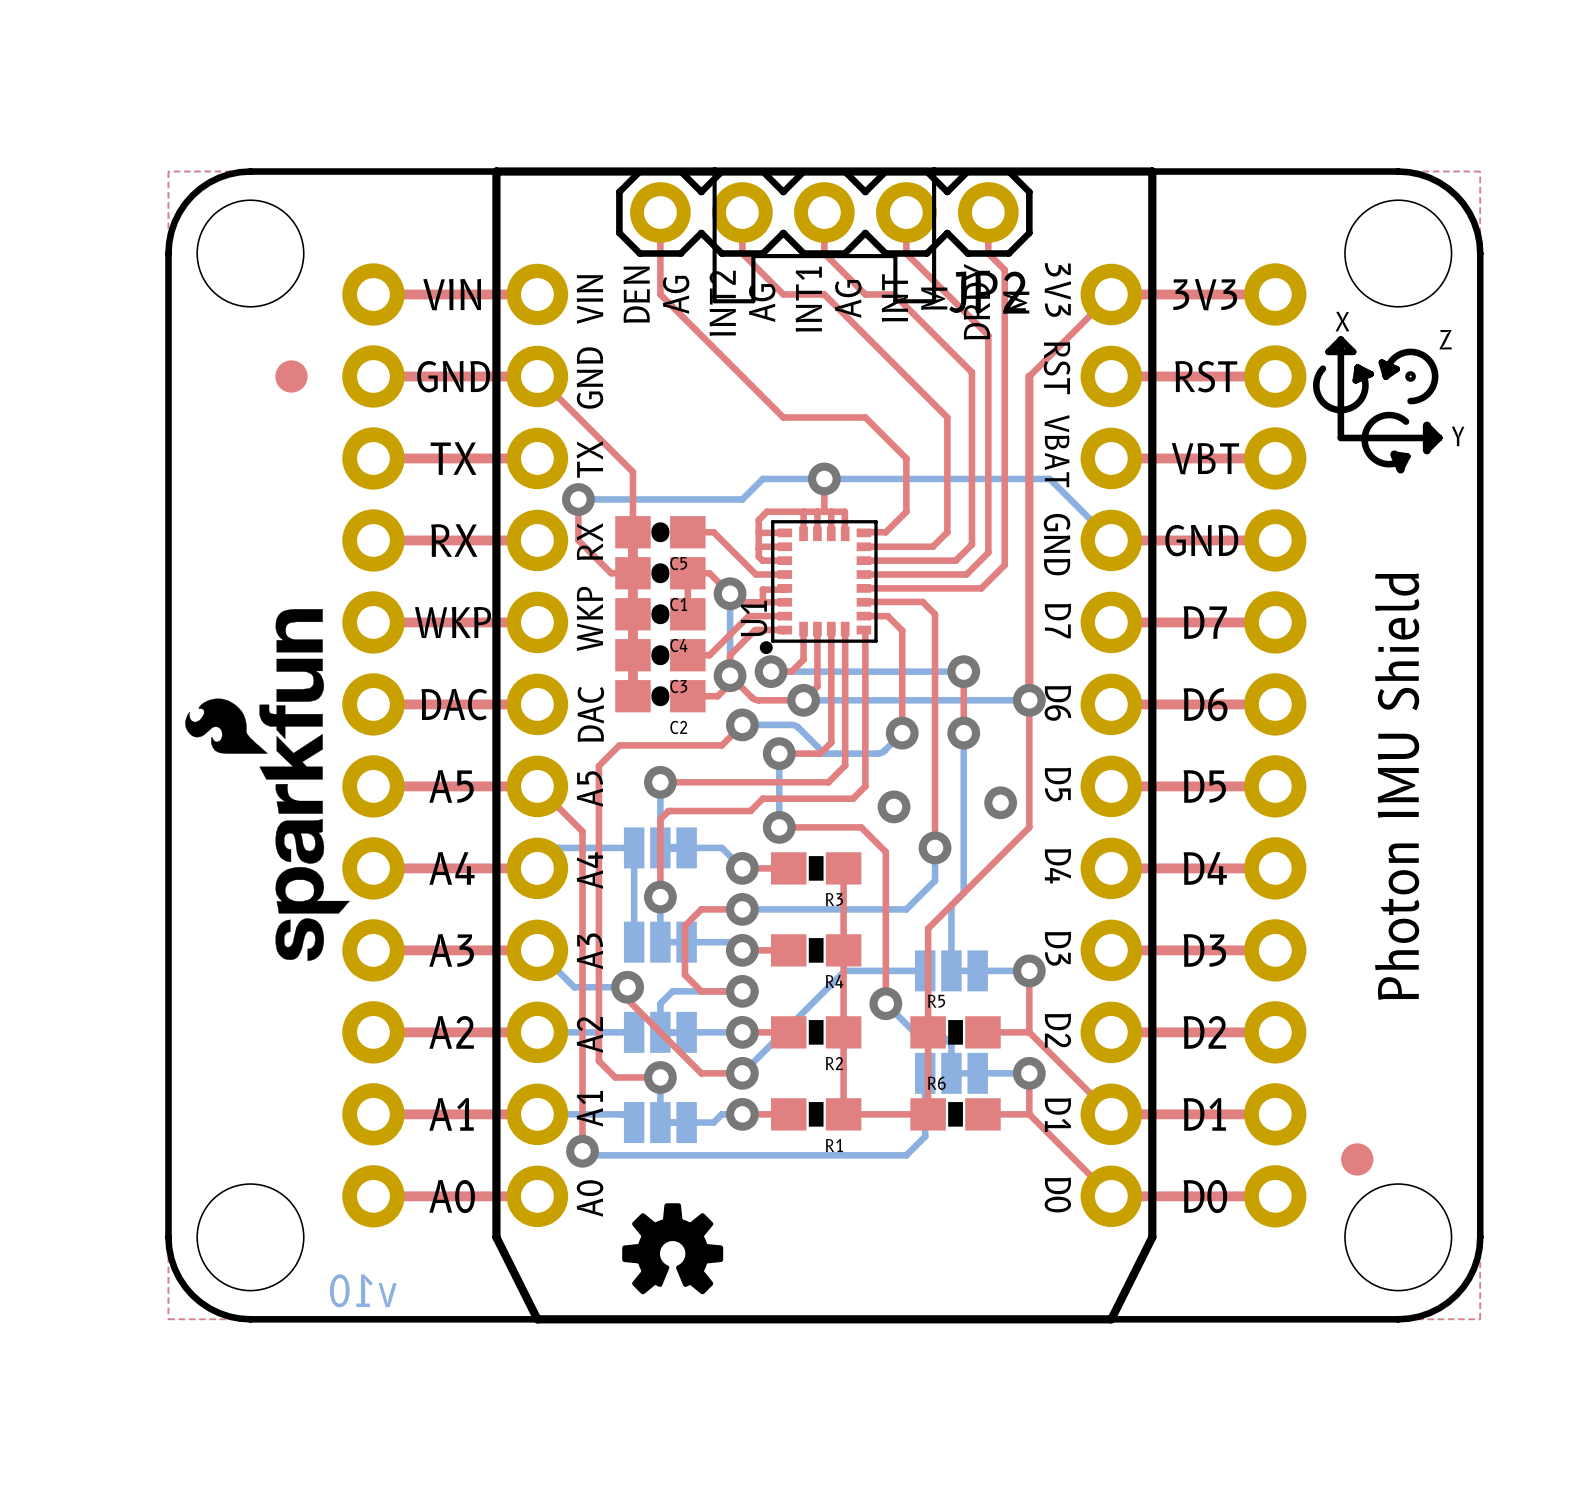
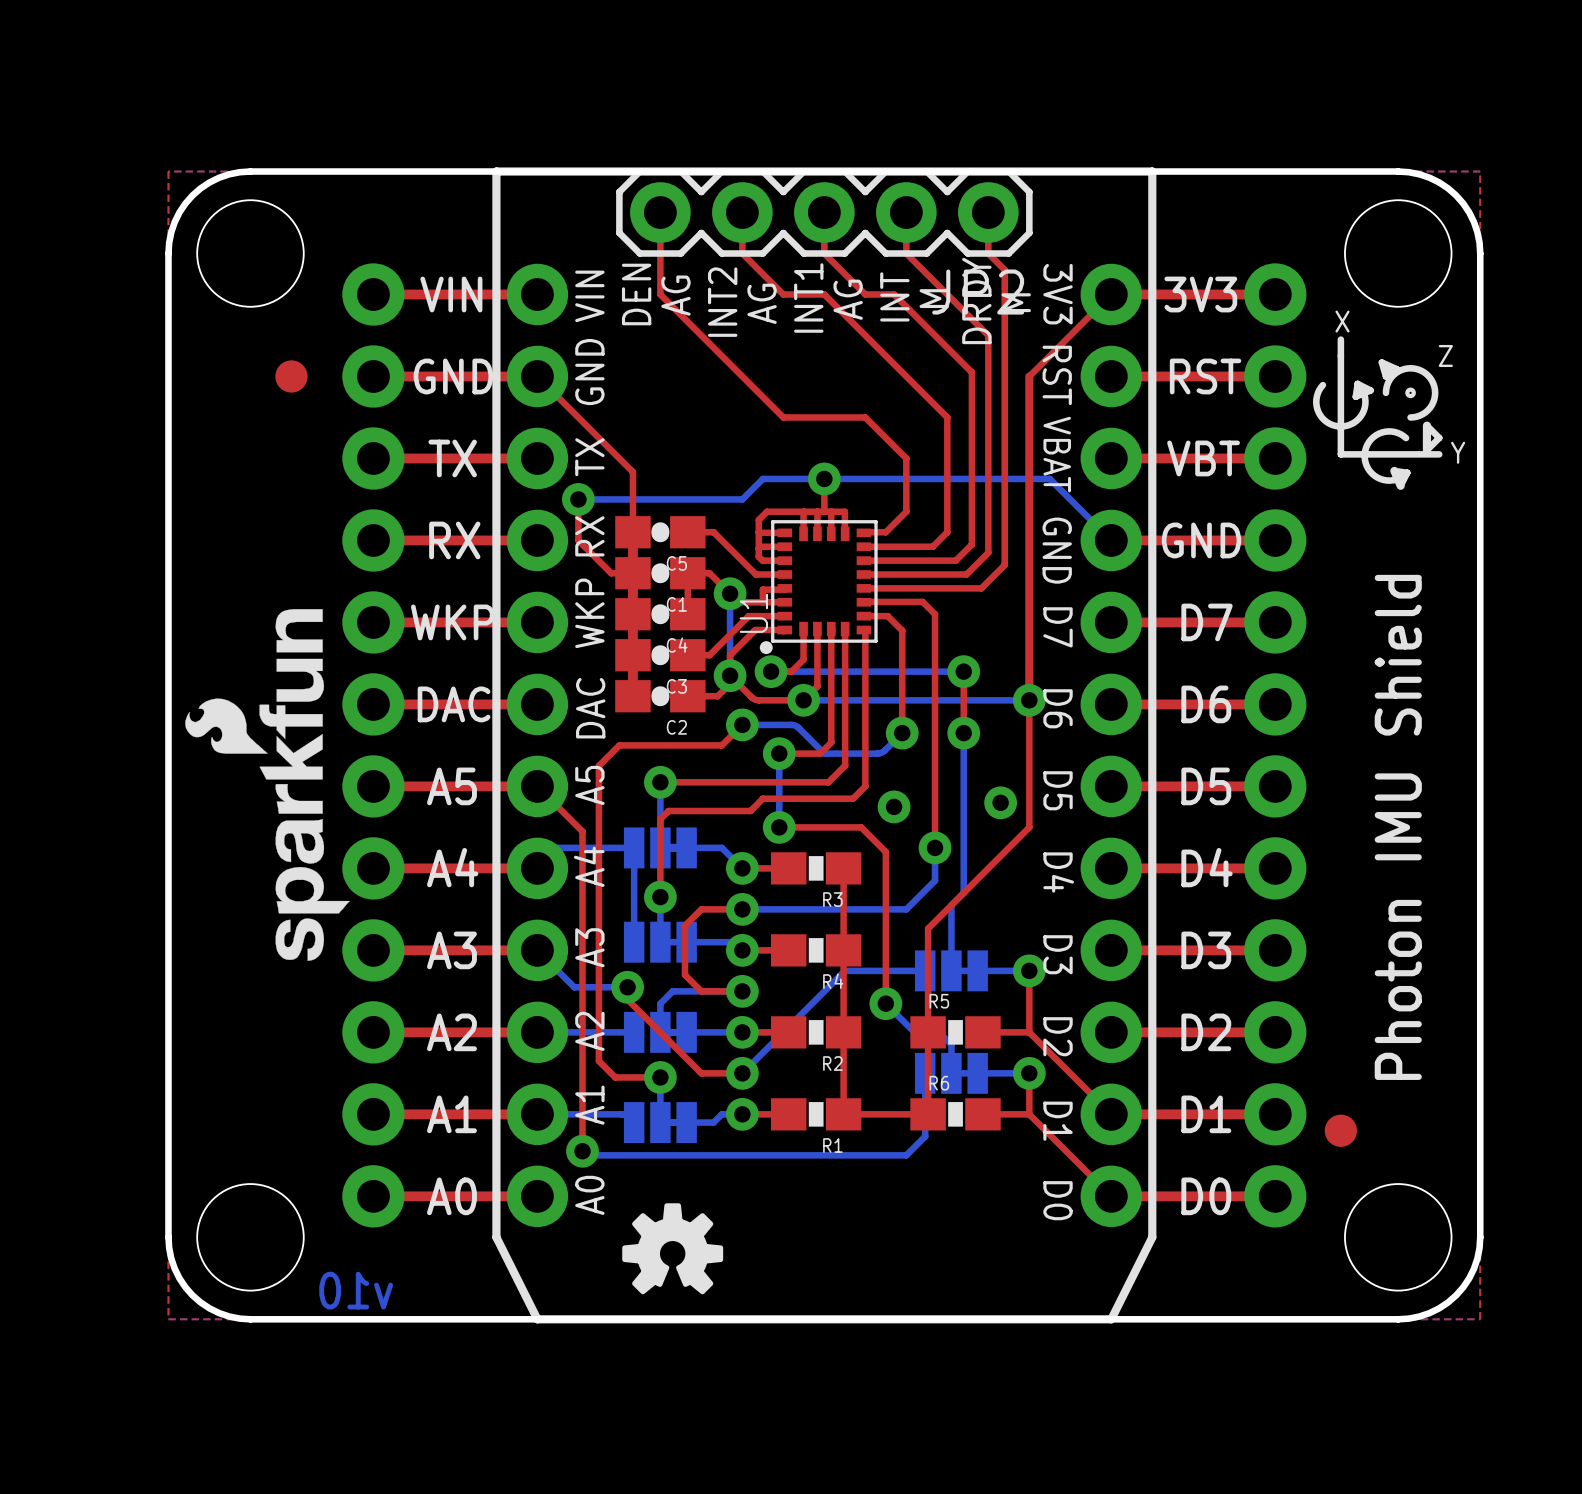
part footprint: [197, 167, 1452, 1324] -> [197, 167, 1452, 1324]
line: (1340, 339) (1353, 351) (1328, 351) (1340, 339) -> none
text position: Z (1445, 339) -> Z (1445, 355)
line: (1357, 367) (1355, 380) (1370, 374) (1357, 367) -> (1357, 383) (1355, 396) (1370, 390) (1357, 383)
line: (1357, 367) (1365, 381) (1363, 394) (1356, 404) (1341, 410) (1326, 405) (1318, 395) (1316, 383) (1322, 368) -> (1357, 383) (1365, 397) (1363, 410) (1356, 420) (1341, 426) (1326, 421) (1318, 412) (1316, 399) (1322, 385)
line: (1385, 376) (1389, 364) (1401, 353) (1413, 352) (1427, 359) (1434, 373) (1433, 385) (1422, 397) (1410, 401) -> (1385, 392) (1389, 380) (1401, 370) (1413, 368) (1427, 375) (1434, 389) (1433, 402) (1422, 414) (1410, 417)
drawing position: (1410, 376) -> (1410, 392)
line: (1406, 421) (1391, 415) (1379, 417) (1369, 425) (1364, 440) (1370, 455) (1380, 462) (1393, 463) (1407, 456) -> (1406, 438) (1391, 431) (1379, 433) (1369, 441) (1364, 456) (1370, 471) (1380, 479) (1393, 480) (1407, 472)
text position: Y (1458, 436) -> Y (1458, 452)
line: (1340, 437) (1439, 437) -> (1340, 437) (1340, 454) (1439, 454)
line: (1407, 456) (1394, 454) (1400, 469) (1407, 456) -> (1407, 472) (1394, 470) (1400, 485) (1407, 472)
text position: Photon IMU Shield (1397, 786) -> Photon IMU Shield (1398, 827)
part position: (1357, 1159) -> (1340, 1130)

